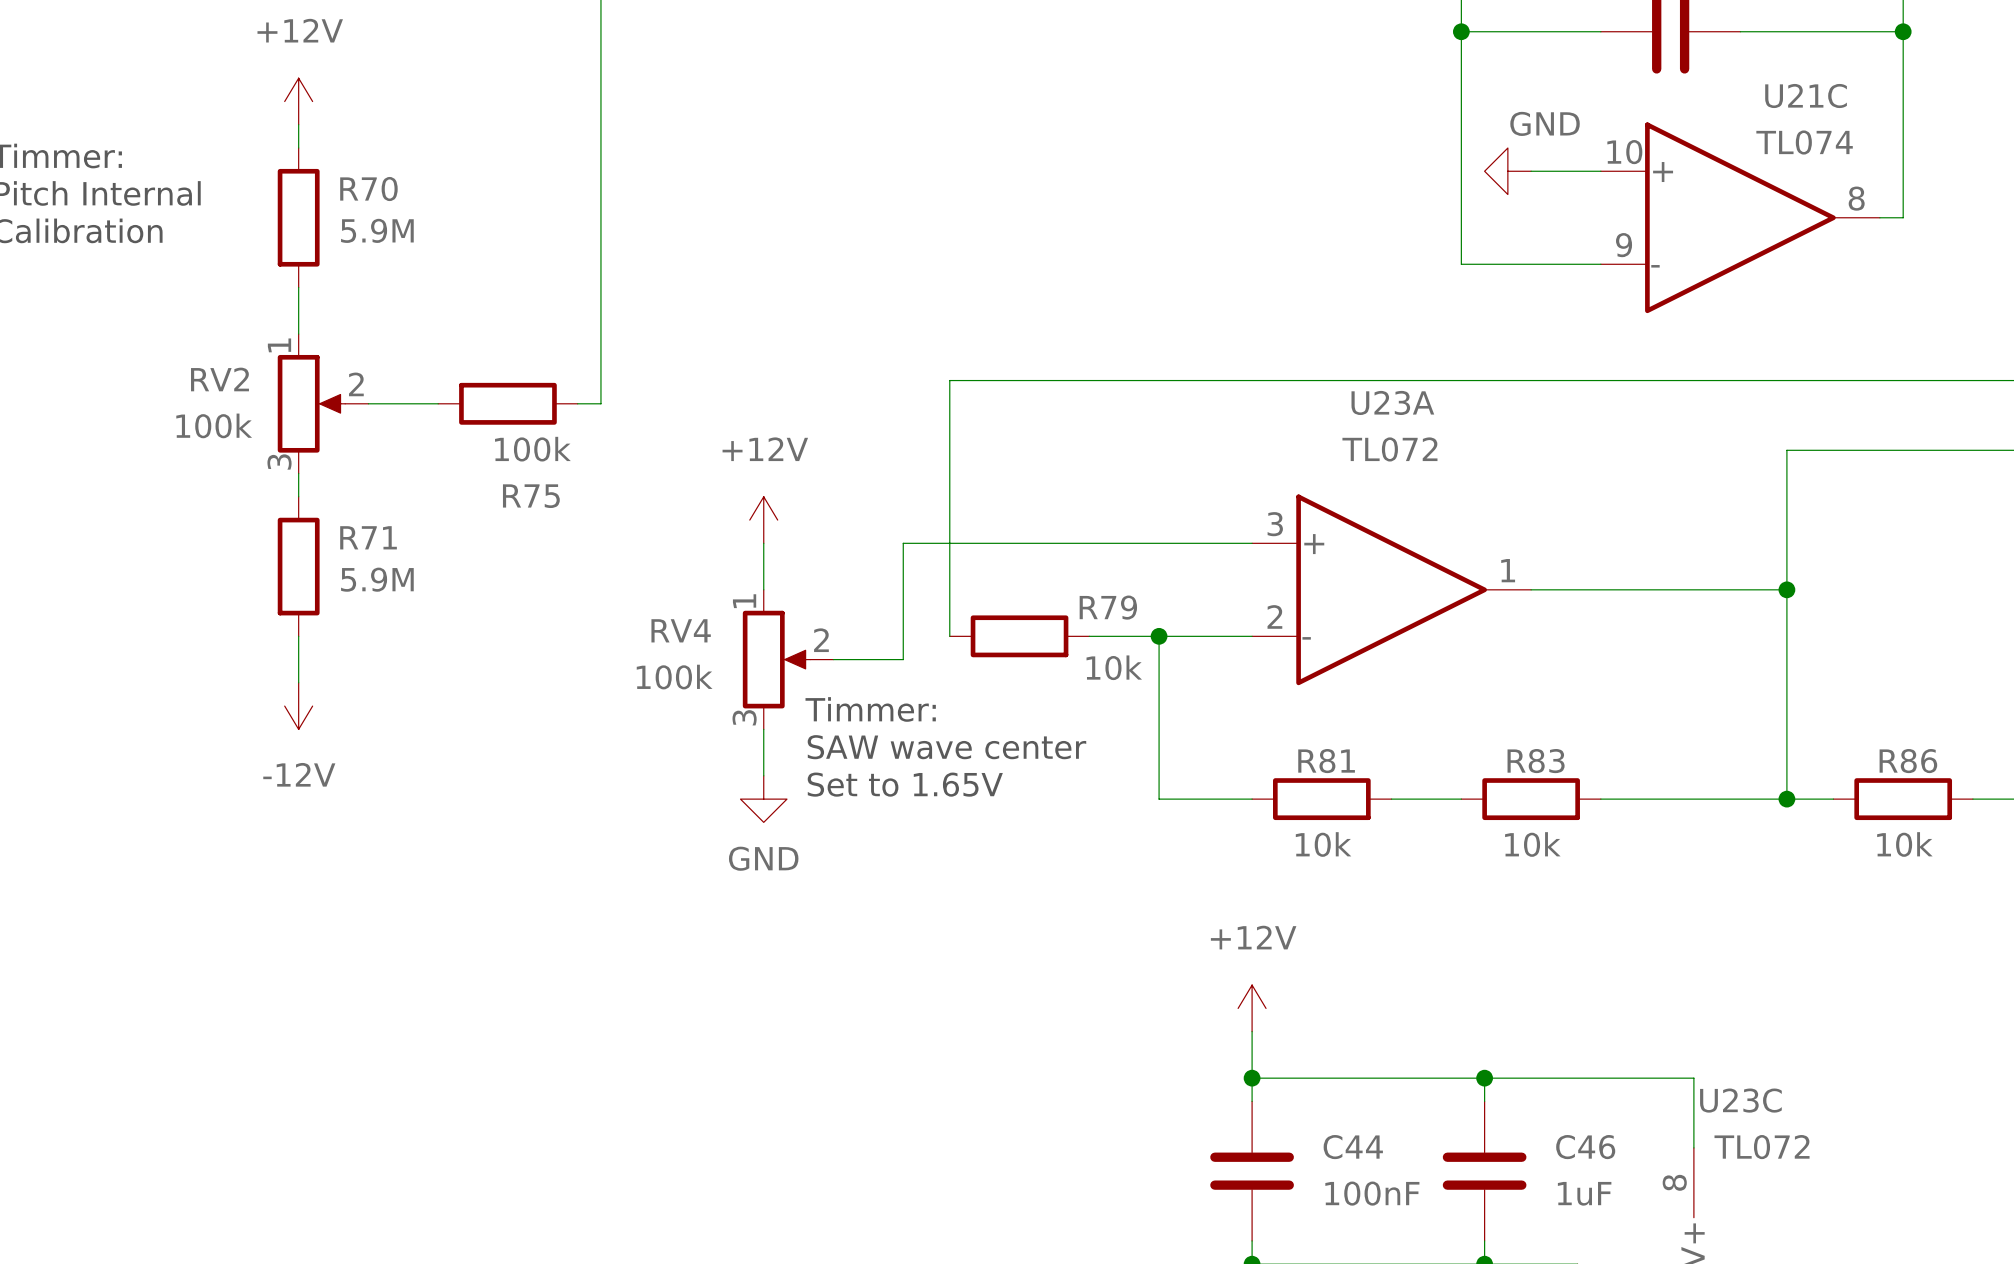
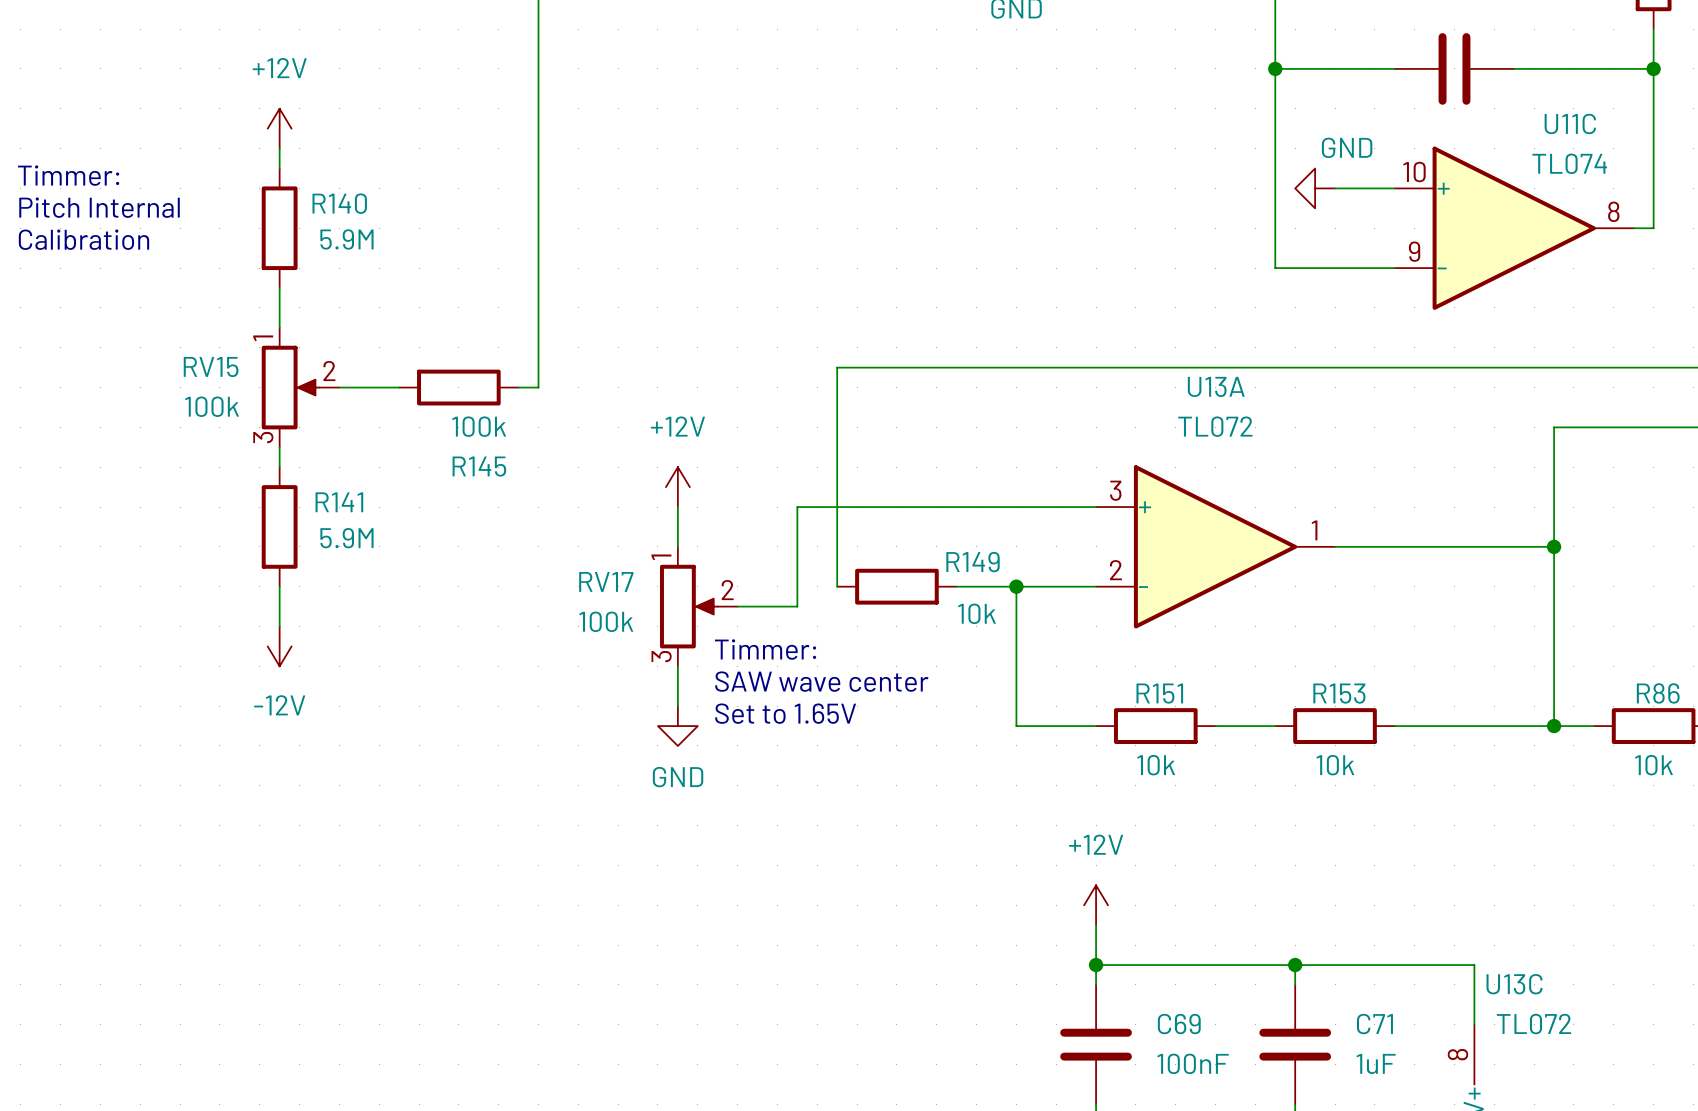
U21C name: U21C (1806, 96) -> U11C (1570, 123)
R70 name: R70 (368, 189) -> R140 (339, 203)
RV2 name: RV2 (219, 379) -> RV15 (211, 366)
U23A name: U23A (1392, 402) -> U13A (1216, 386)
R75 name: R75 (531, 496) -> R145 (479, 466)
R71 name: R71 (368, 537) -> R141 (339, 502)
R79 name: R79 (1108, 607) -> R149 (973, 562)
RV4 name: RV4 (681, 630) -> RV17 (606, 581)
R81 name: R81 (1326, 761) -> R151 (1159, 693)
R83 name: R83 (1536, 761) -> R153 (1339, 693)
U23C name: U23C (1740, 1100) -> U13C (1514, 984)
C44 name: C44 (1353, 1147) -> C69 (1179, 1024)
C46 name: C46 (1585, 1147) -> C71 (1374, 1024)

